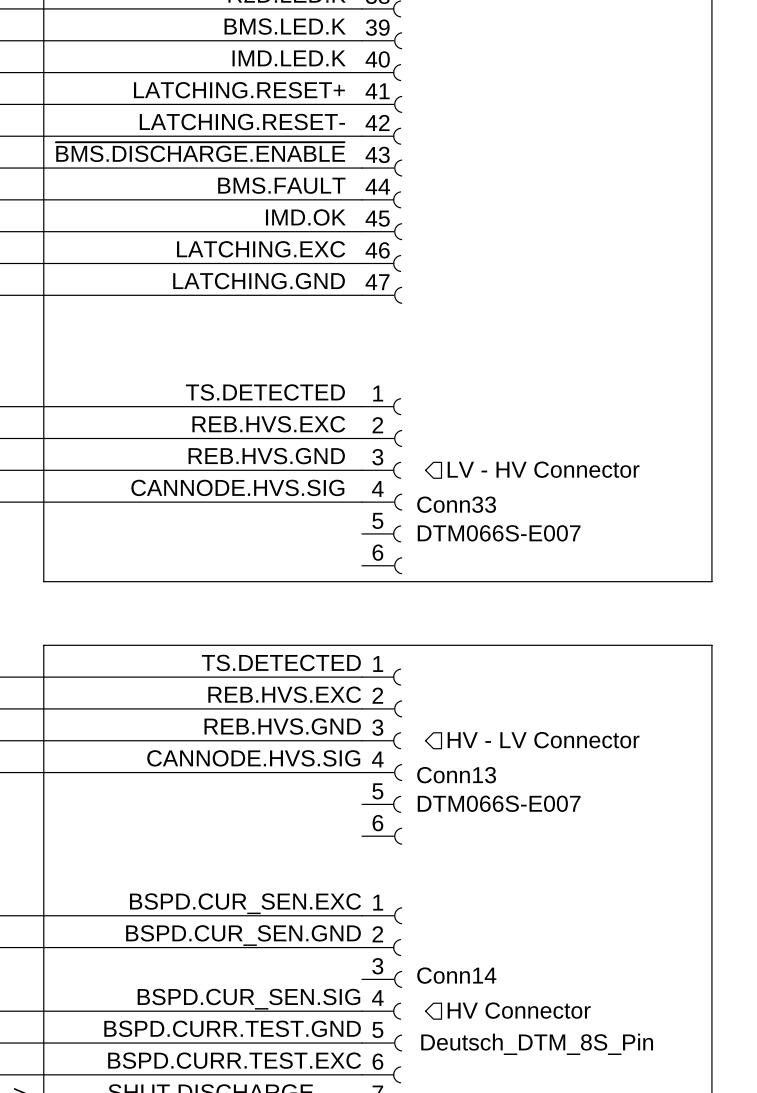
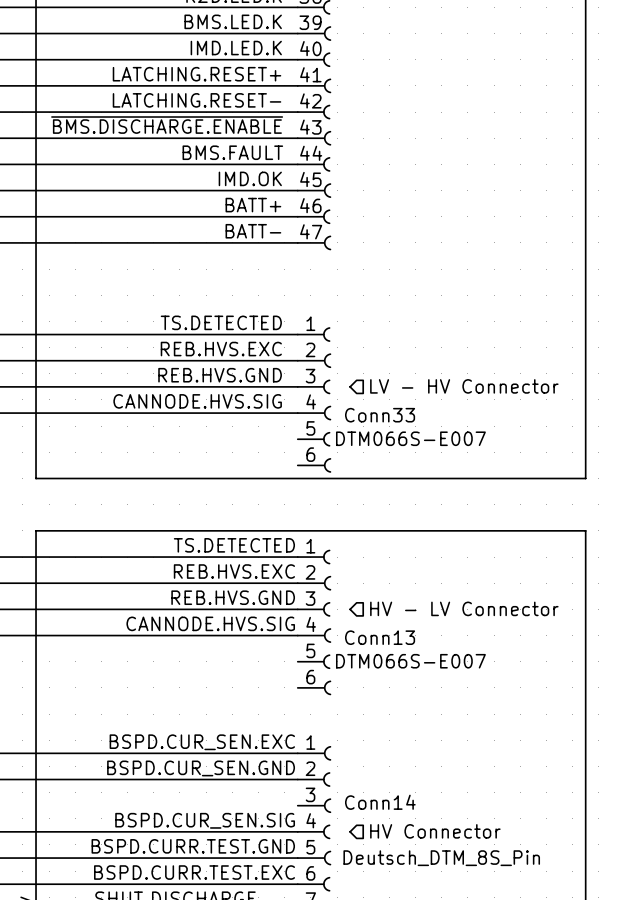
label: LATCHING.EXC (261, 249) -> BATT+ (253, 205)
label: LATCHING.GND (259, 281) -> BATT- (253, 231)

